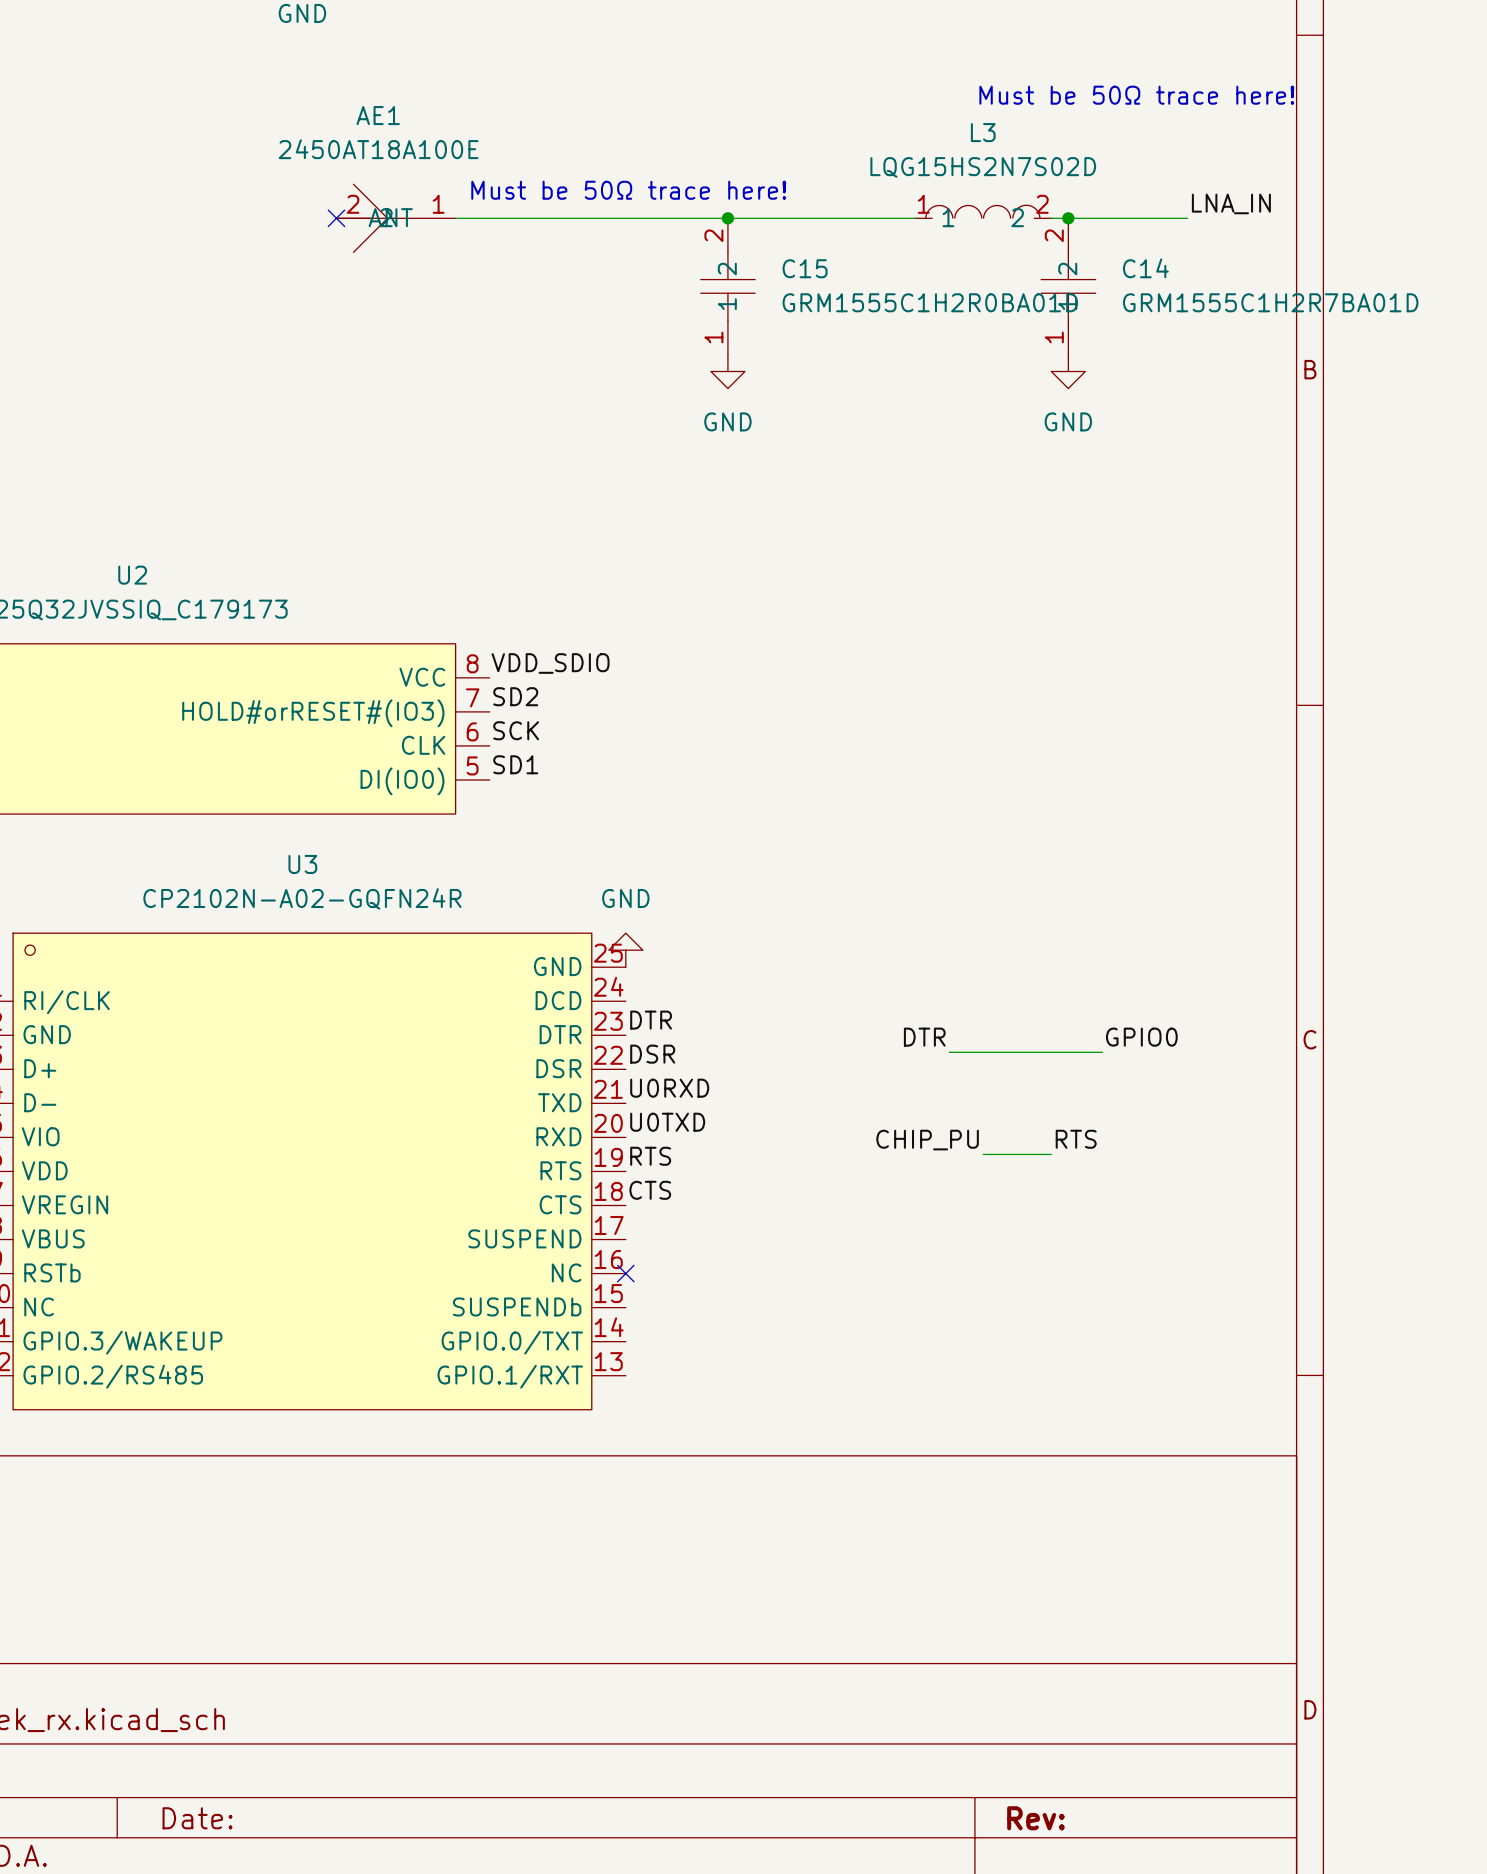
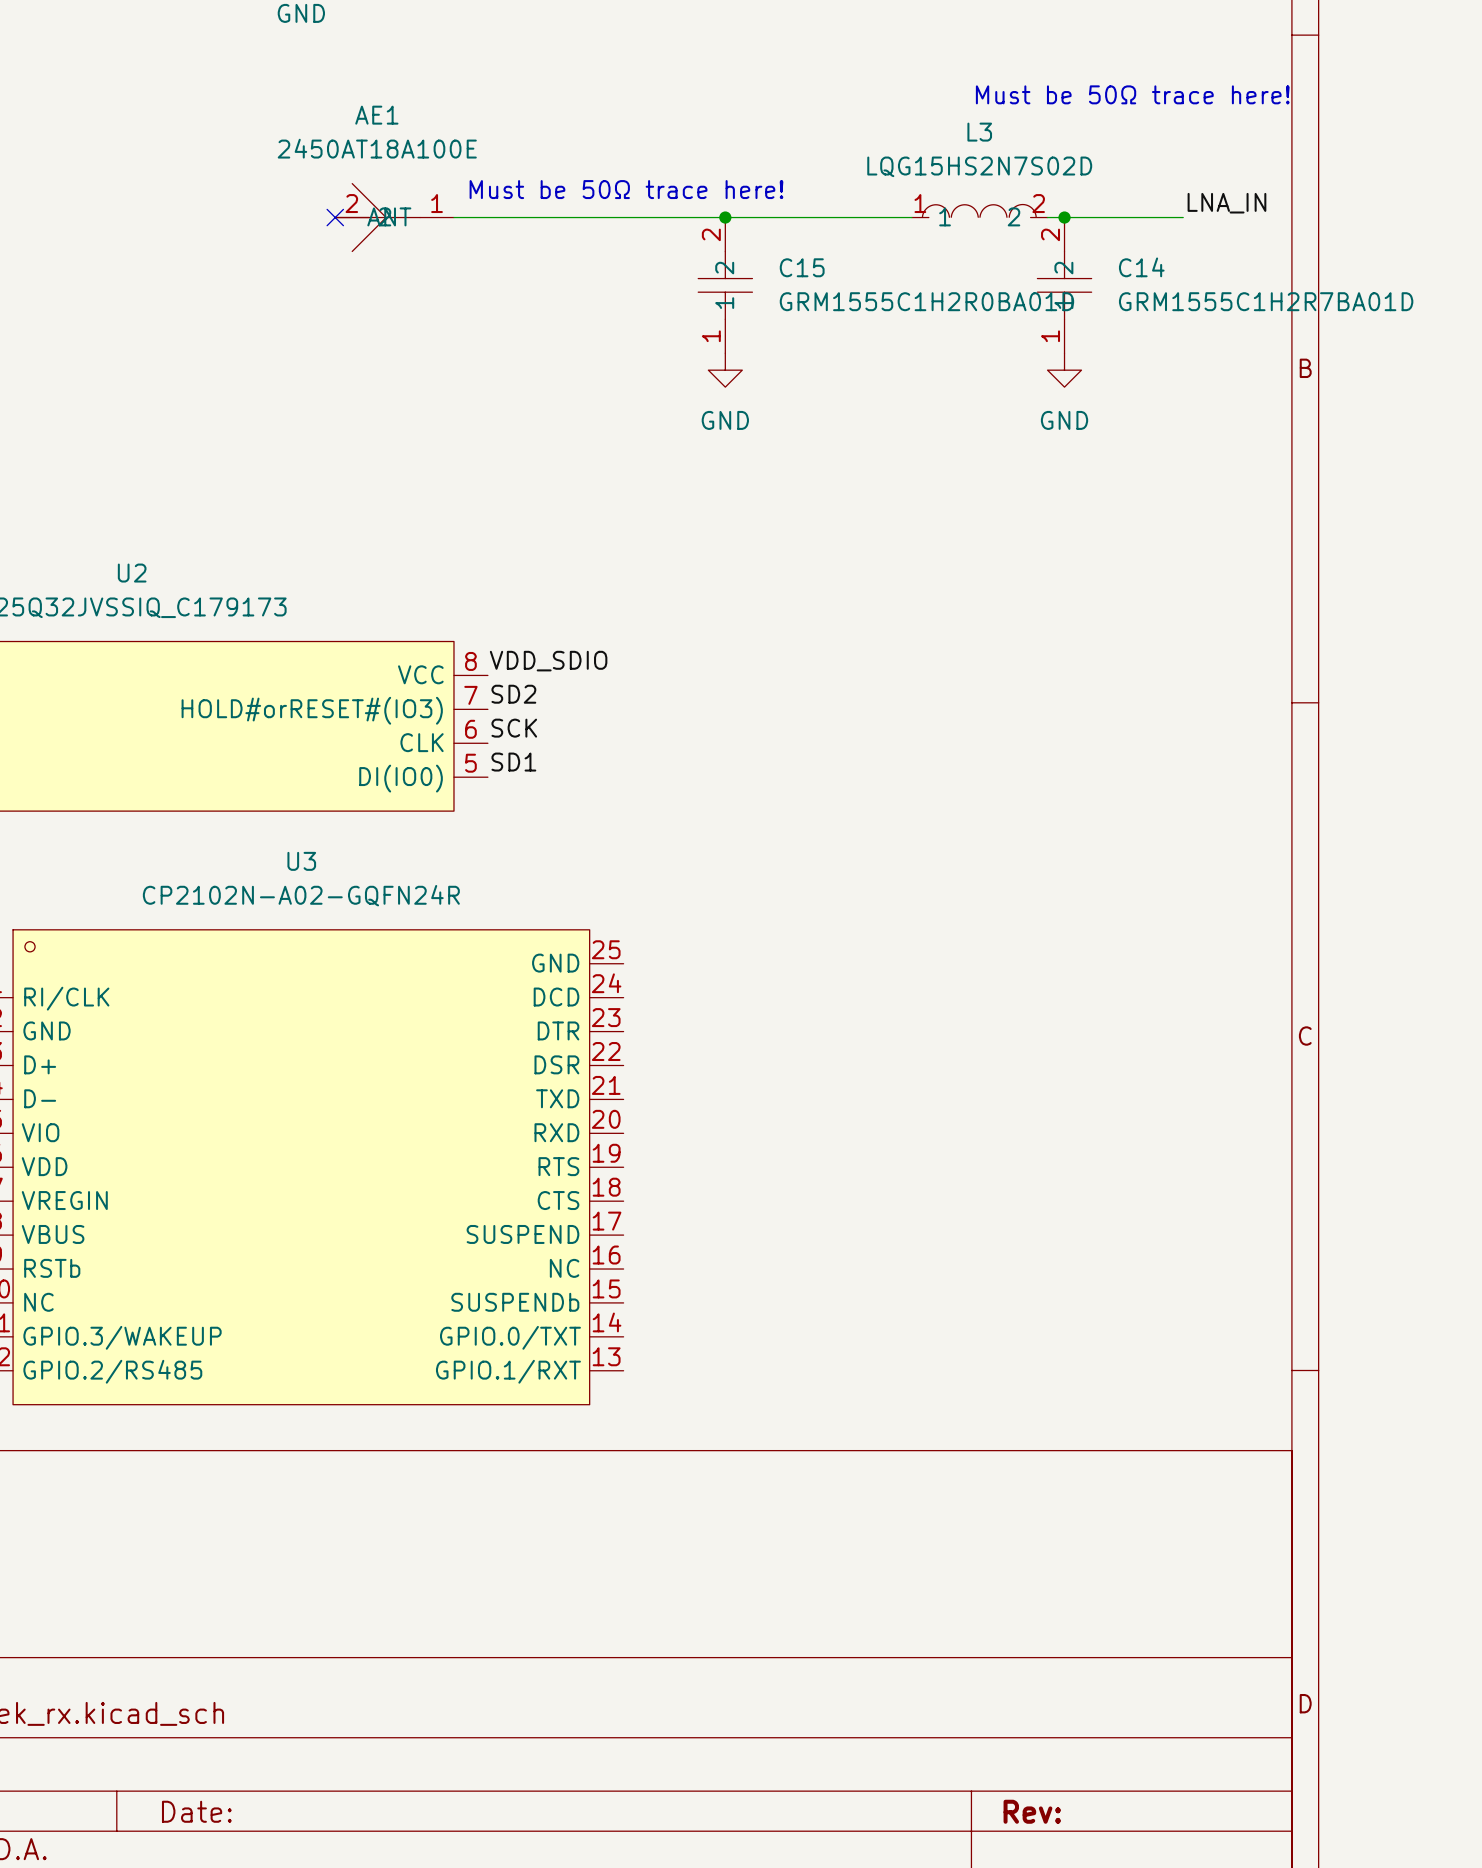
power symbol: GND (625, 950) -> none
label: DTR (651, 1020) -> none
label: DTR (924, 1037) -> none
label: GPIO0 (1141, 1037) -> none
wire: (949, 1052) (1102, 1052) -> none
label: DSR (652, 1054) -> none
label: U0RXD (669, 1088) -> none
label: U0TXD (667, 1122) -> none
label: RTS (1076, 1139) -> none
label: CHIP_PU (927, 1140) -> none
wire: (983, 1154) (1051, 1154) -> none
label: RTS (650, 1156) -> none
label: CTS (650, 1190) -> none
no-connect mark: (625, 1273) -> none

